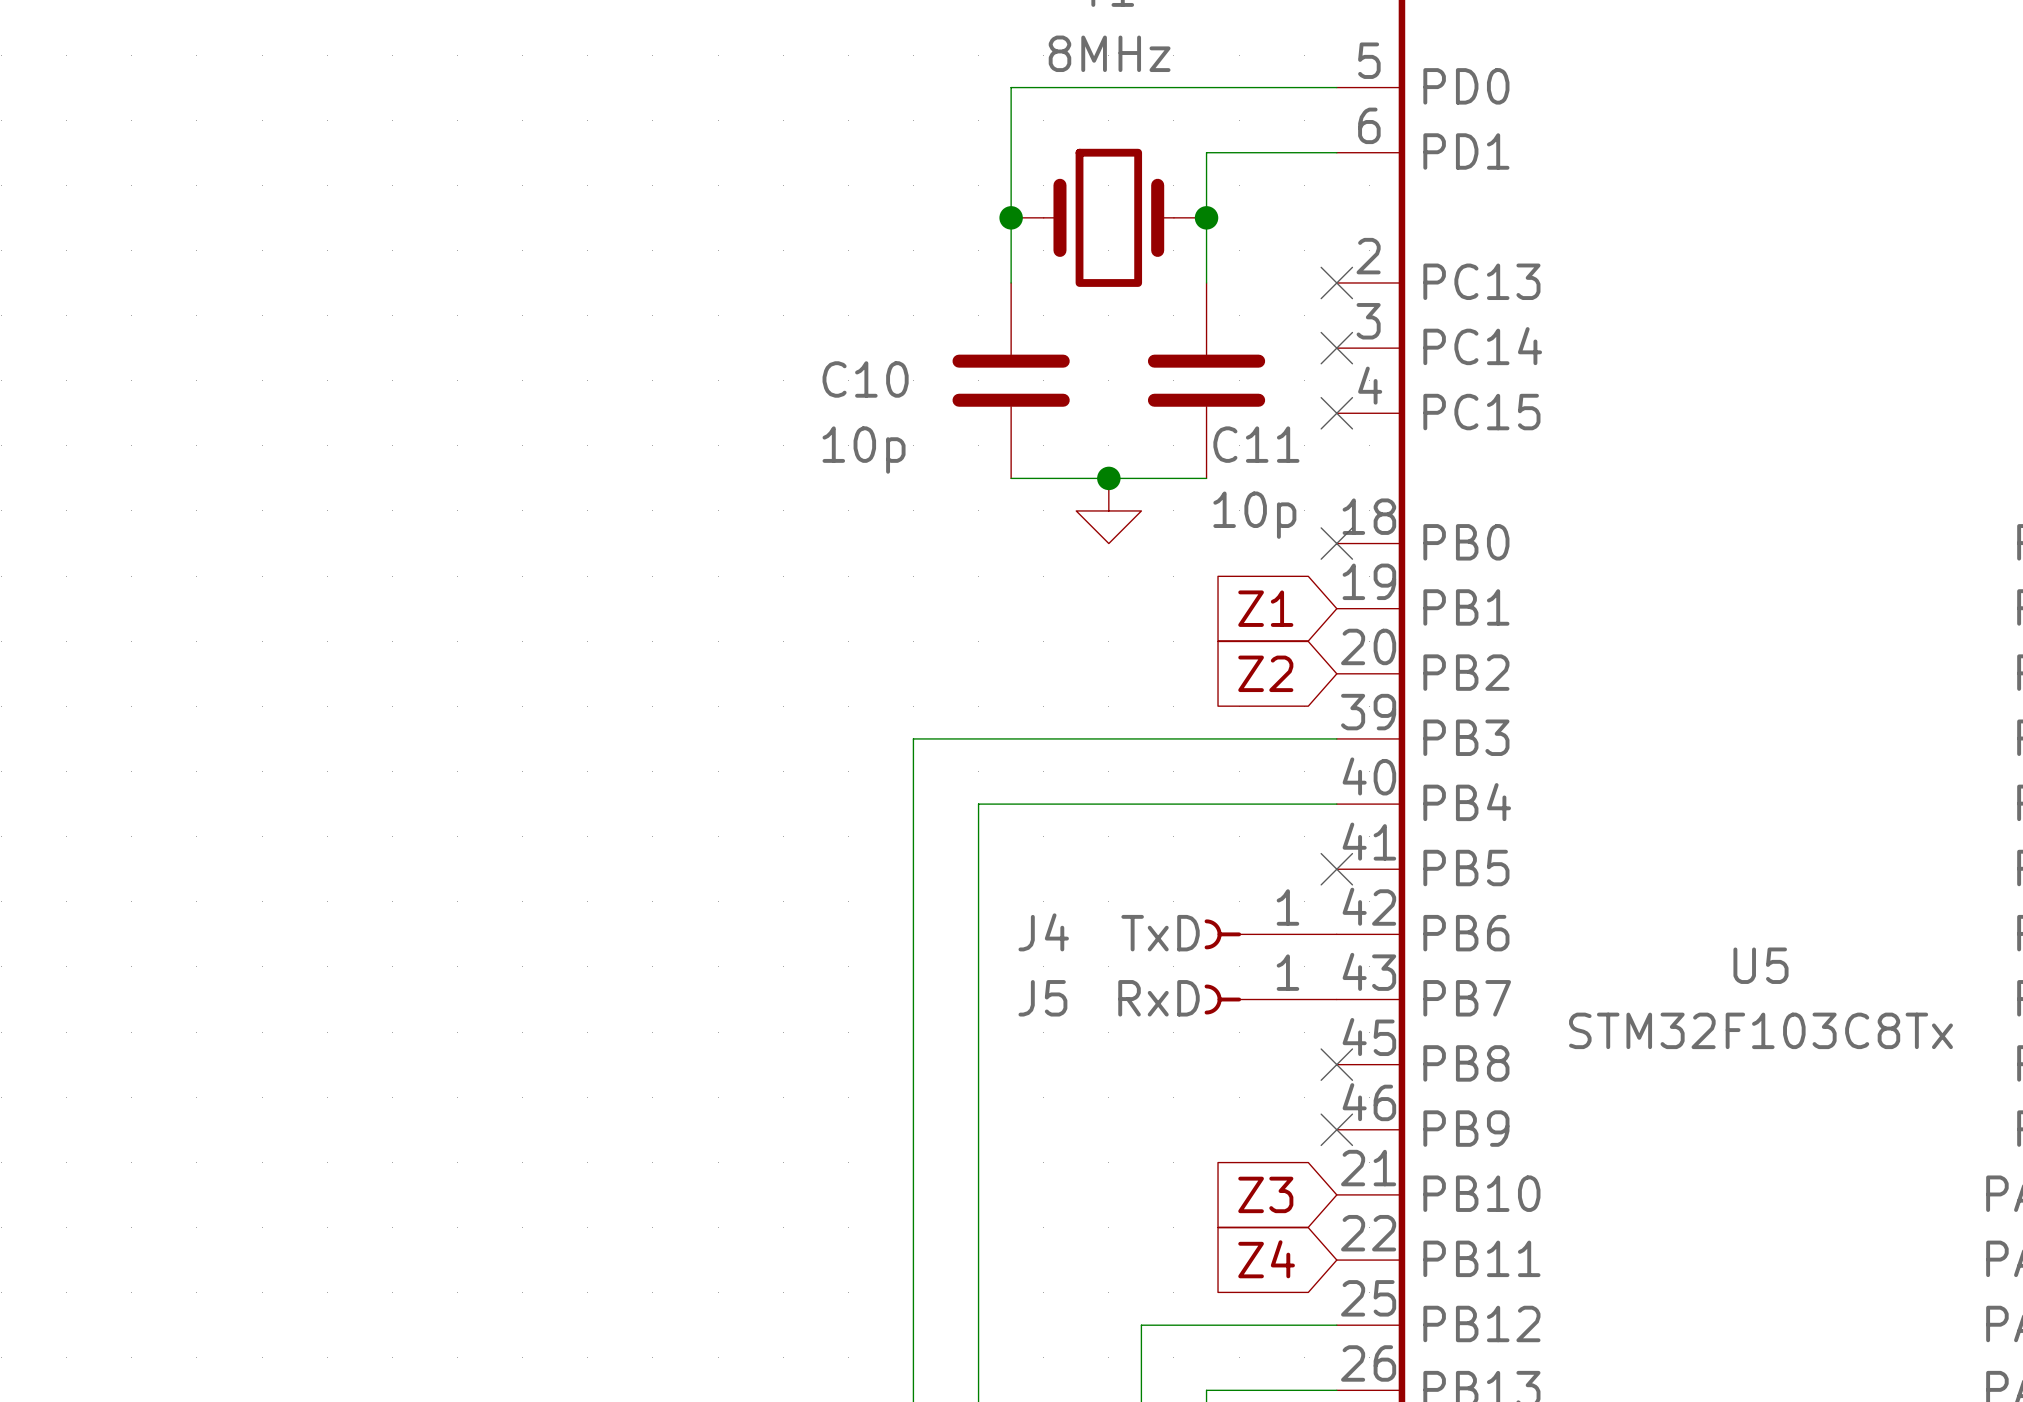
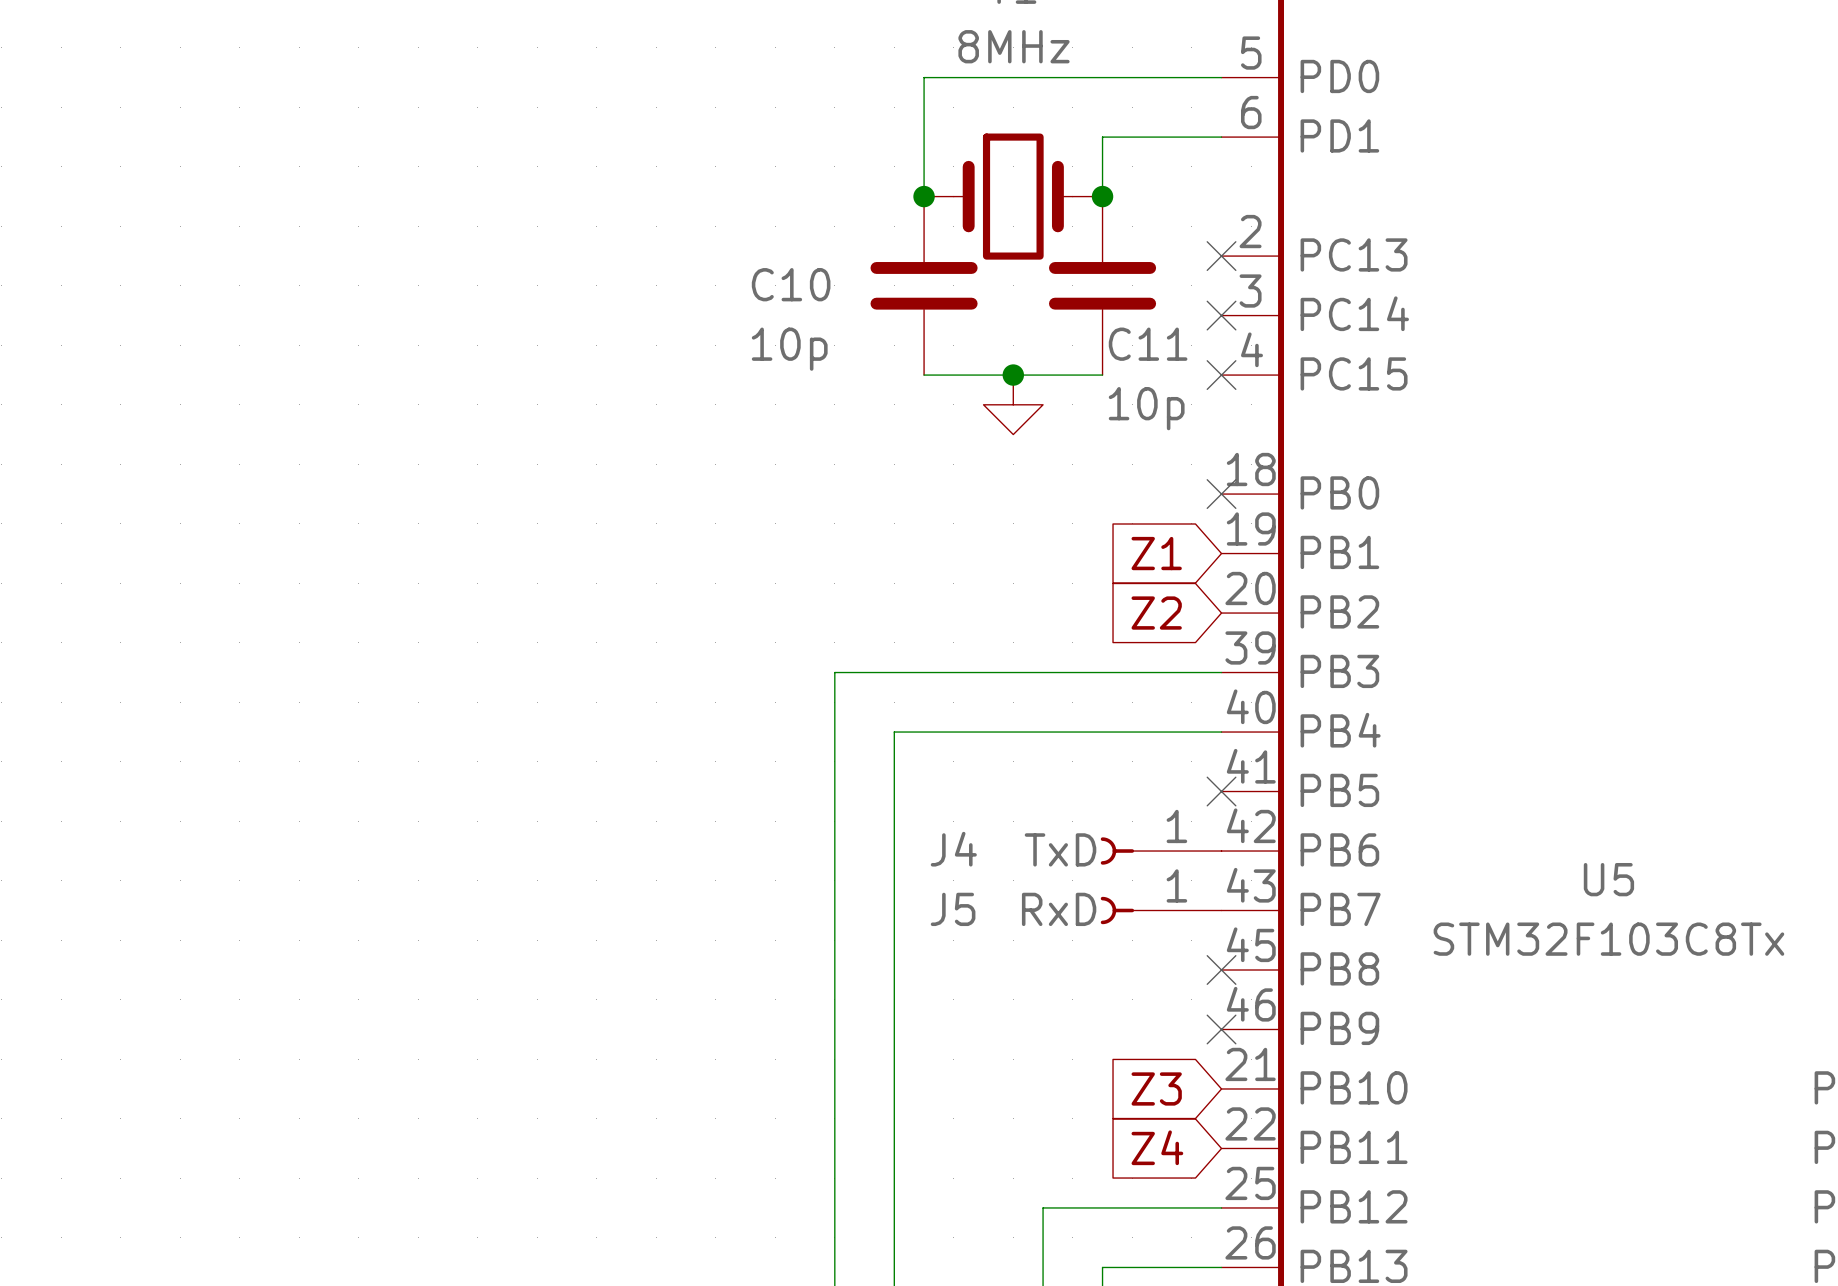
C10 position: (1011, 380) -> (924, 285)
C11 position: (1206, 380) -> (1102, 285)
wire: (1011, 478) (1206, 478) -> (924, 375) (1102, 375)
junction position: (1108, 478) -> (1013, 375)
power symbol position: (1108, 510) -> (1013, 404)

